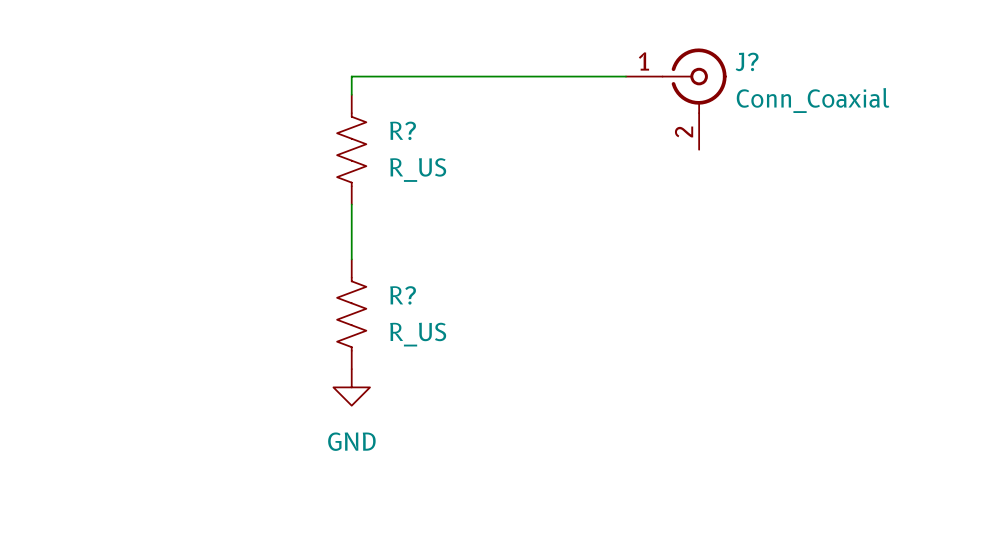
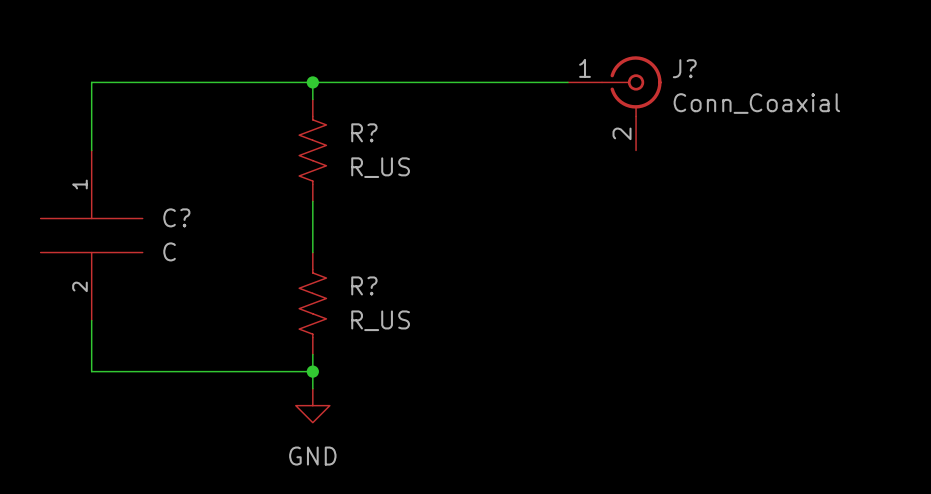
wire: none -> (312, 82) (91, 82) (91, 150)
junction: none -> (312, 82)
C?: none -> C (91, 235)
wire: none -> (91, 320) (91, 371) (312, 371)
power symbol position: GND (351, 387) -> GND (312, 405)
junction: none -> (312, 371)

